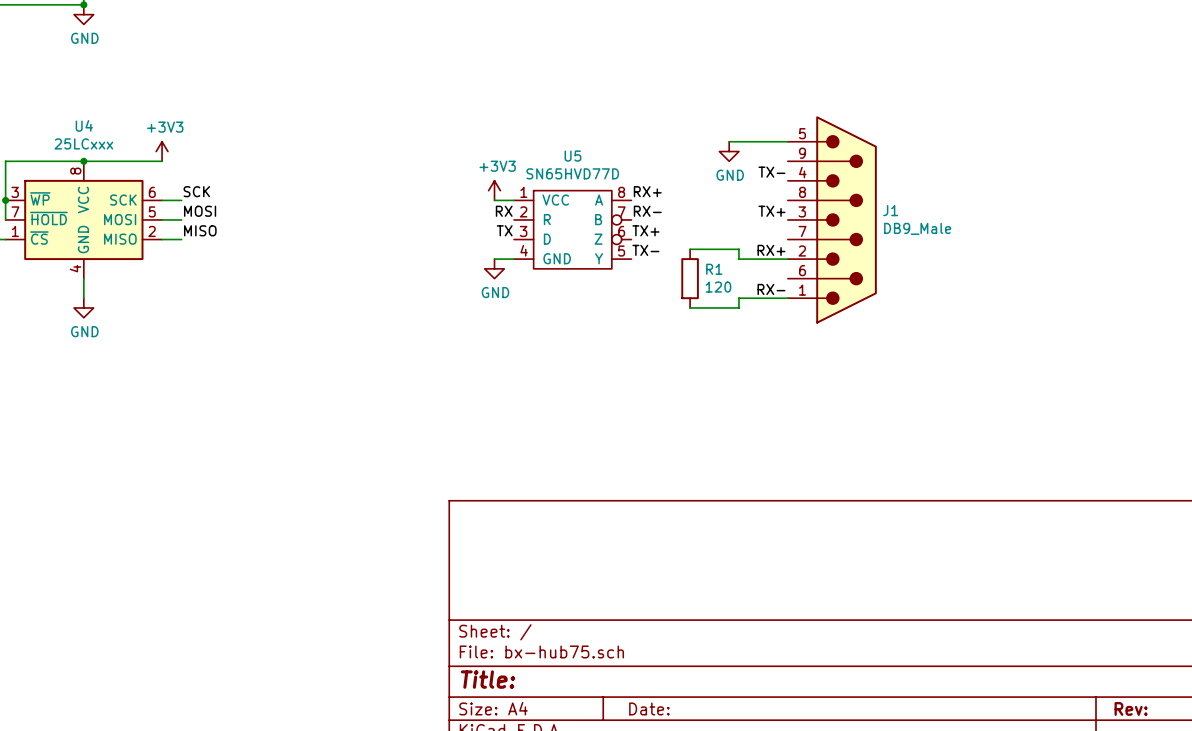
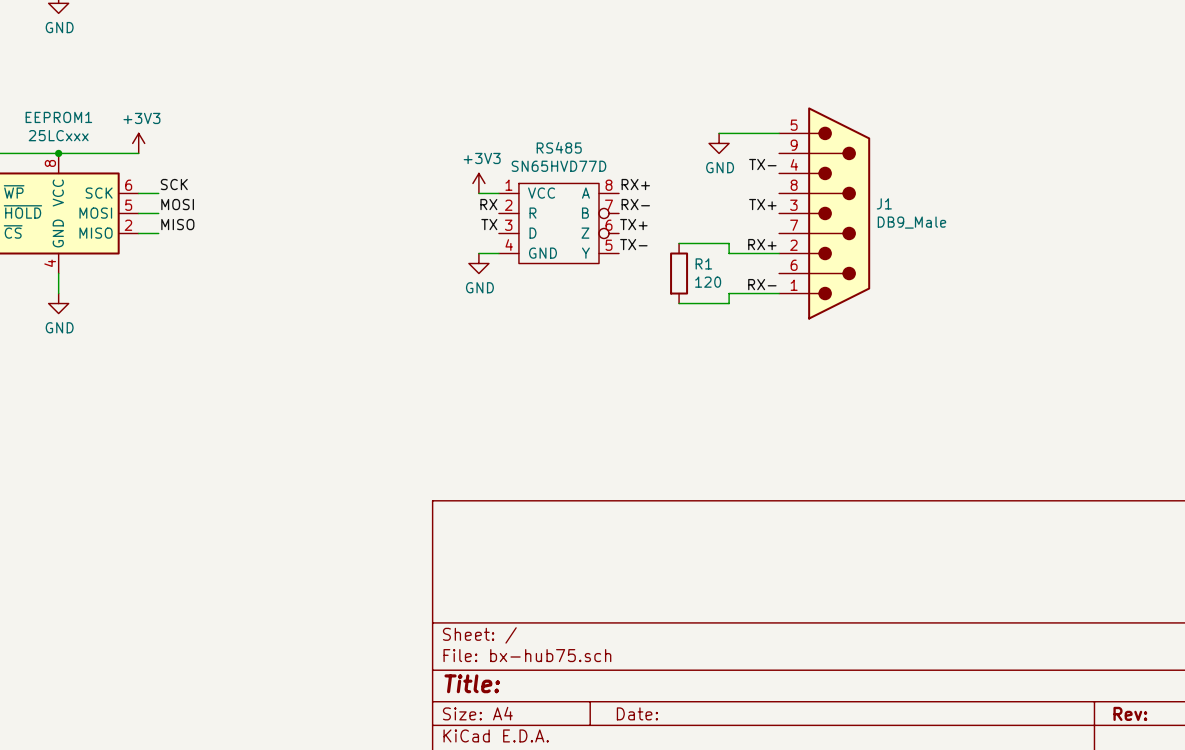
U4 name: U4 (84, 125) -> EEPROM1 (58, 117)
U5 name: U5 (572, 156) -> RS485 (559, 147)

